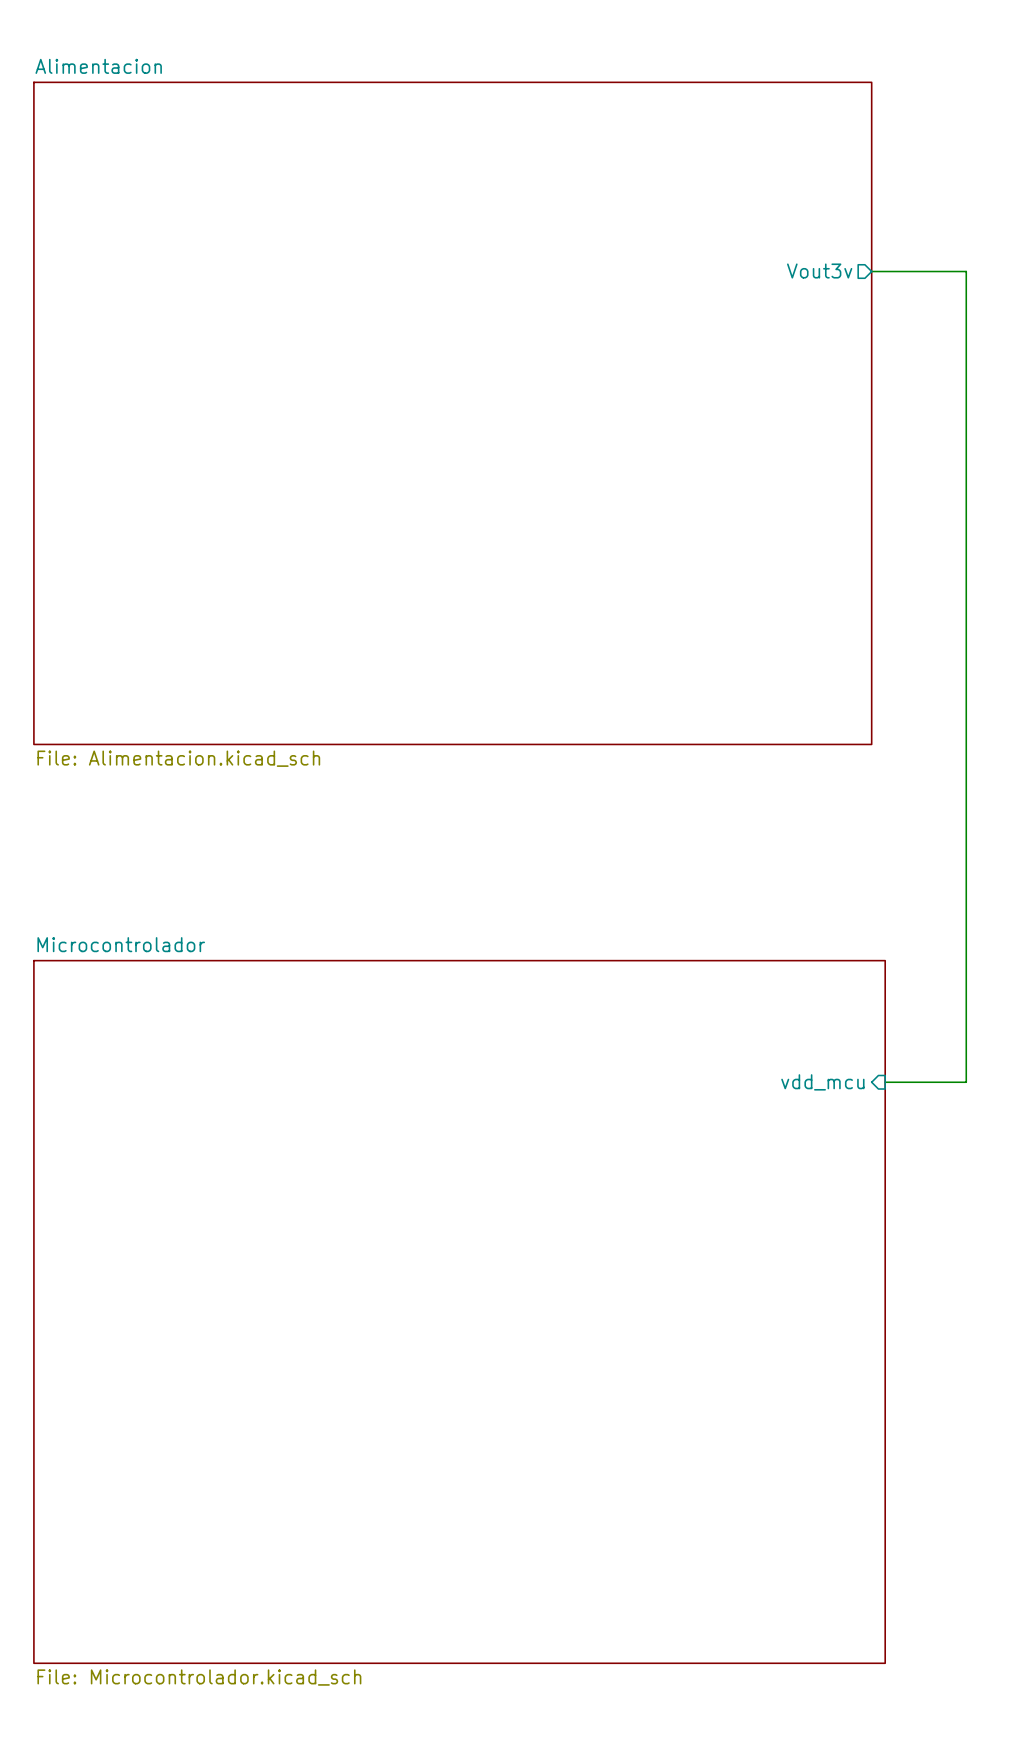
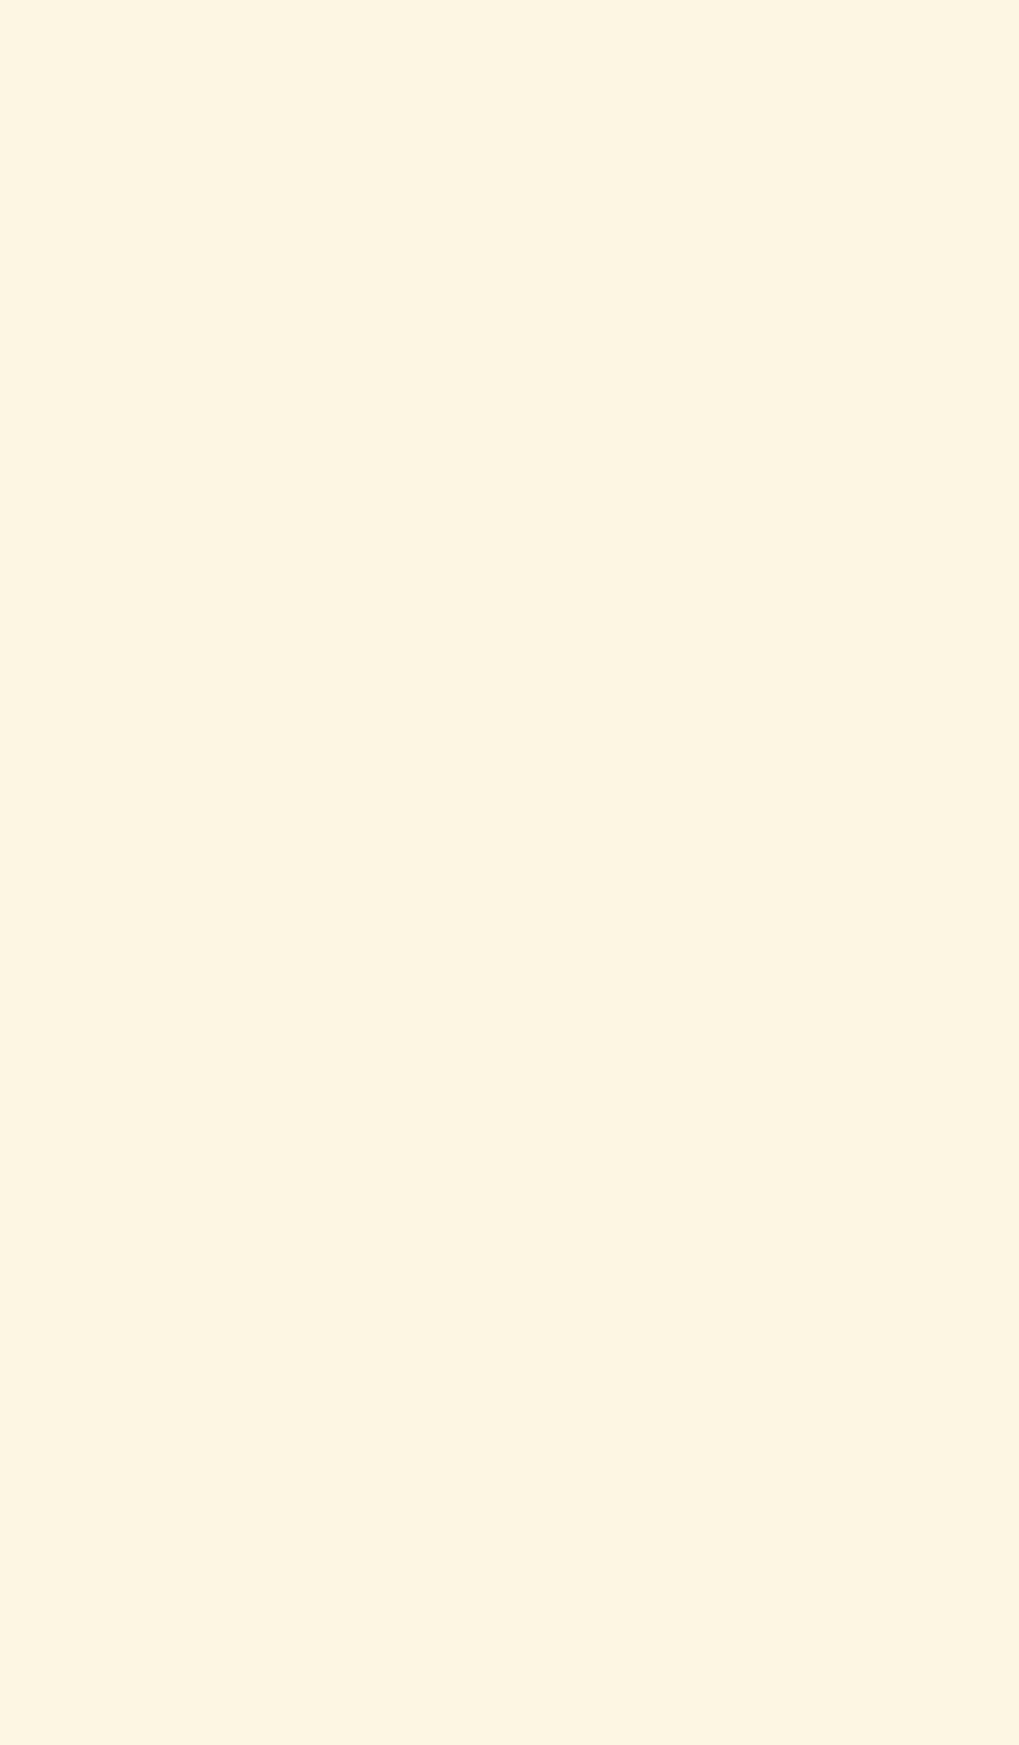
sheet pin: Vout3v (819, 271) -> none
wire: (871, 271) (966, 271) (966, 1082) (885, 1082) -> none
sheet Alimentacion: File: Alimentacion.kicad_sch (452, 413) -> none
sheet pin: vdd_mcu (822, 1082) -> none
sheet Microcontrolador: File: Microcontrolador.kicad_sch (459, 1311) -> none

